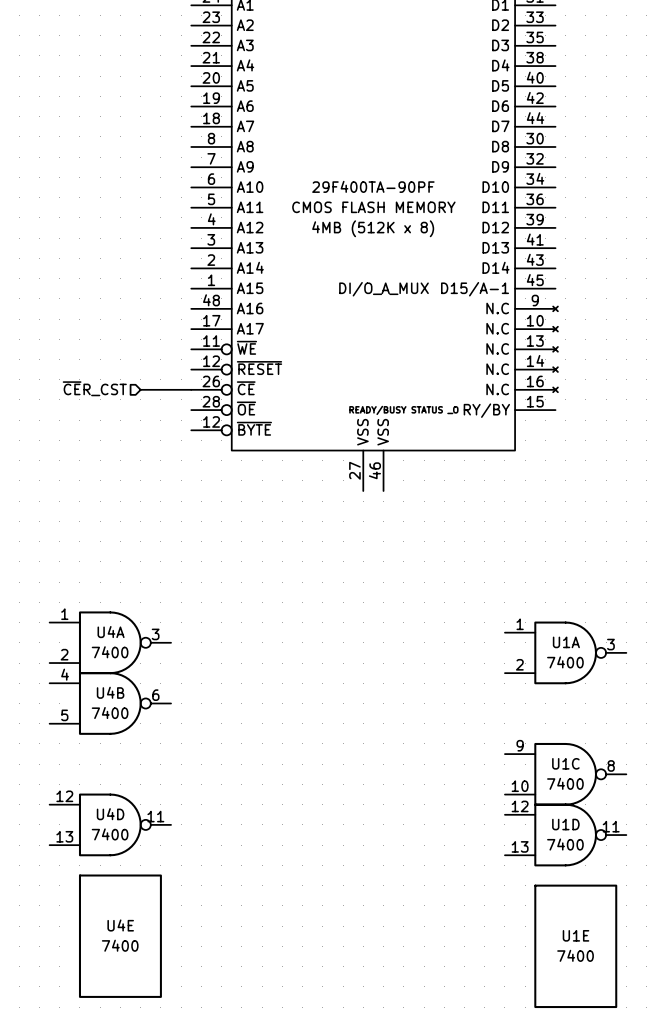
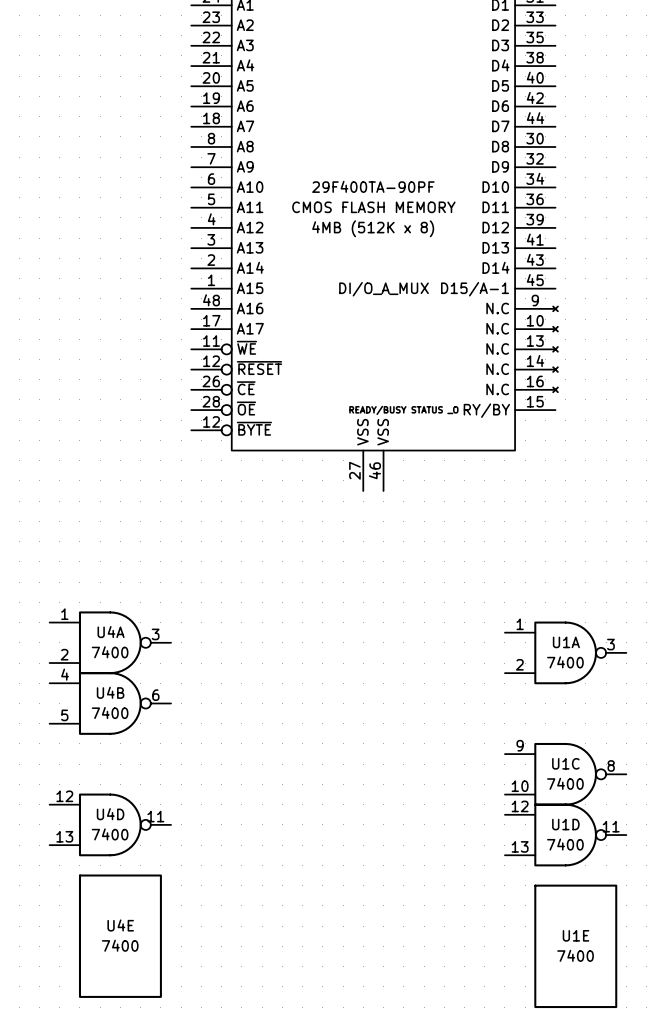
hierarchical label: ~{CE}R_CST (94, 388) -> none
wire: (140, 389) (191, 389) -> none

